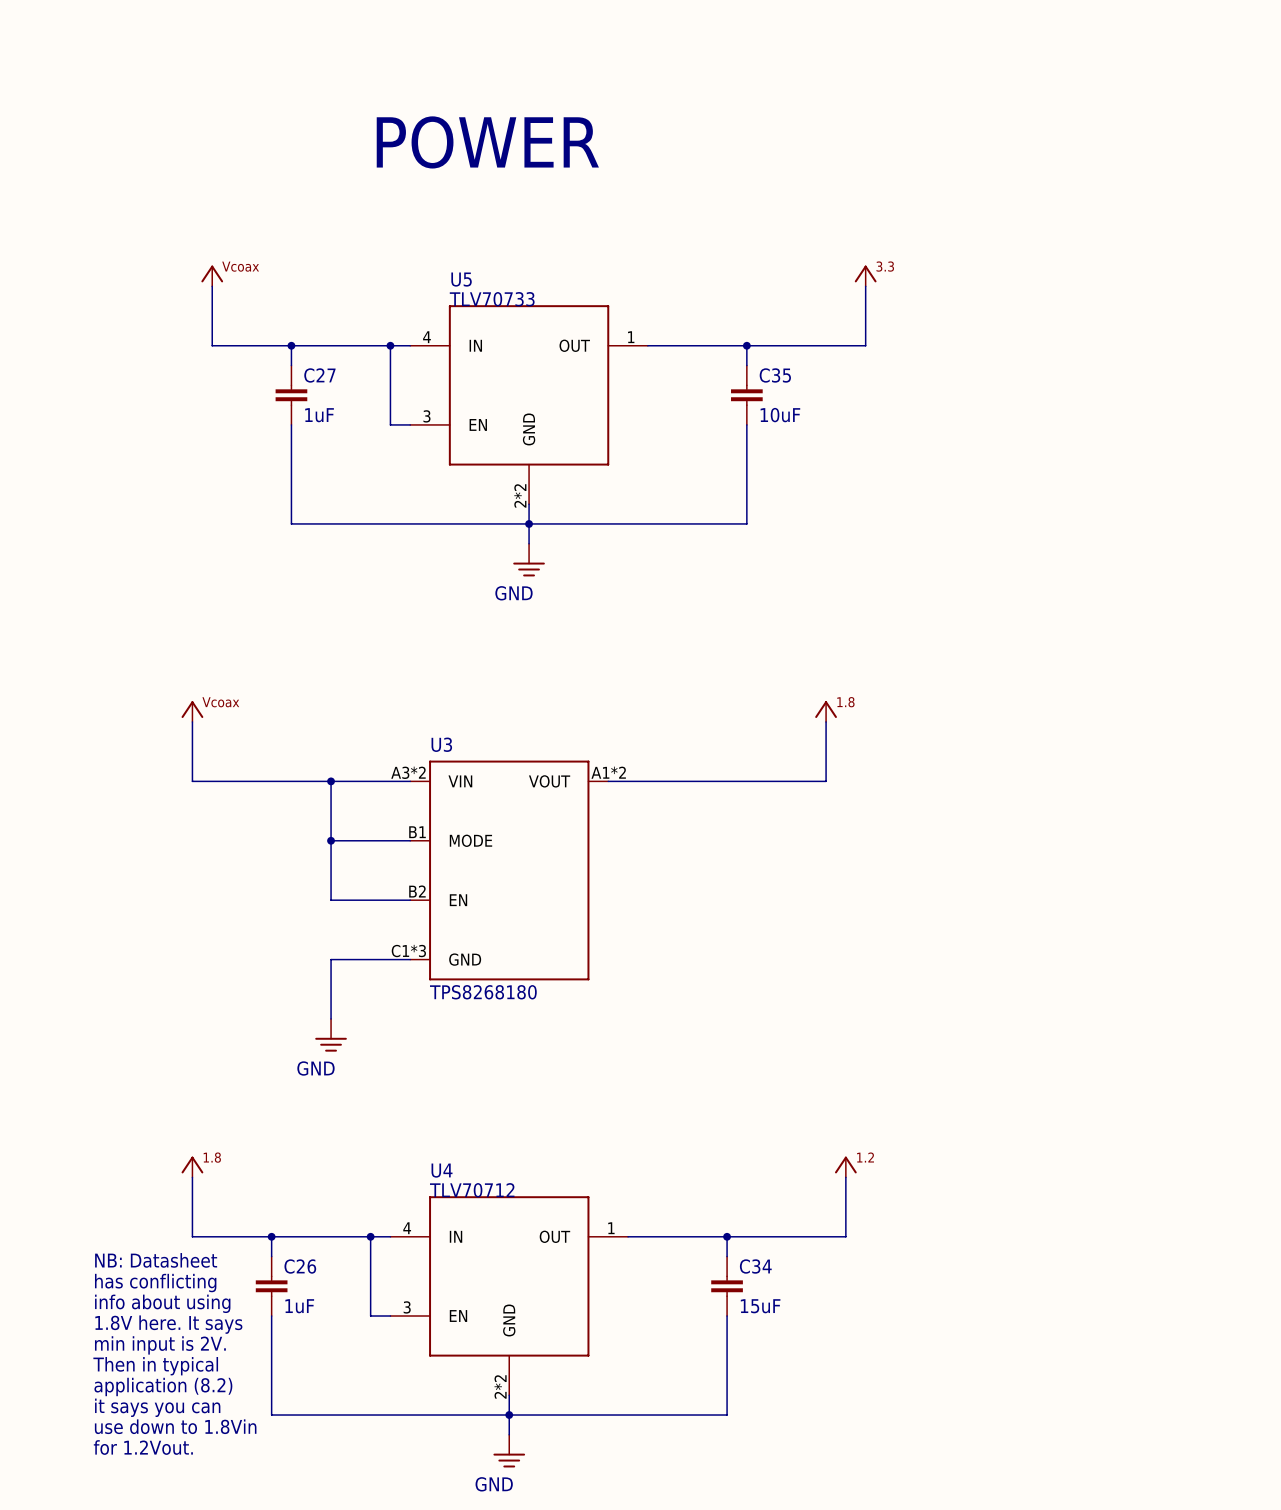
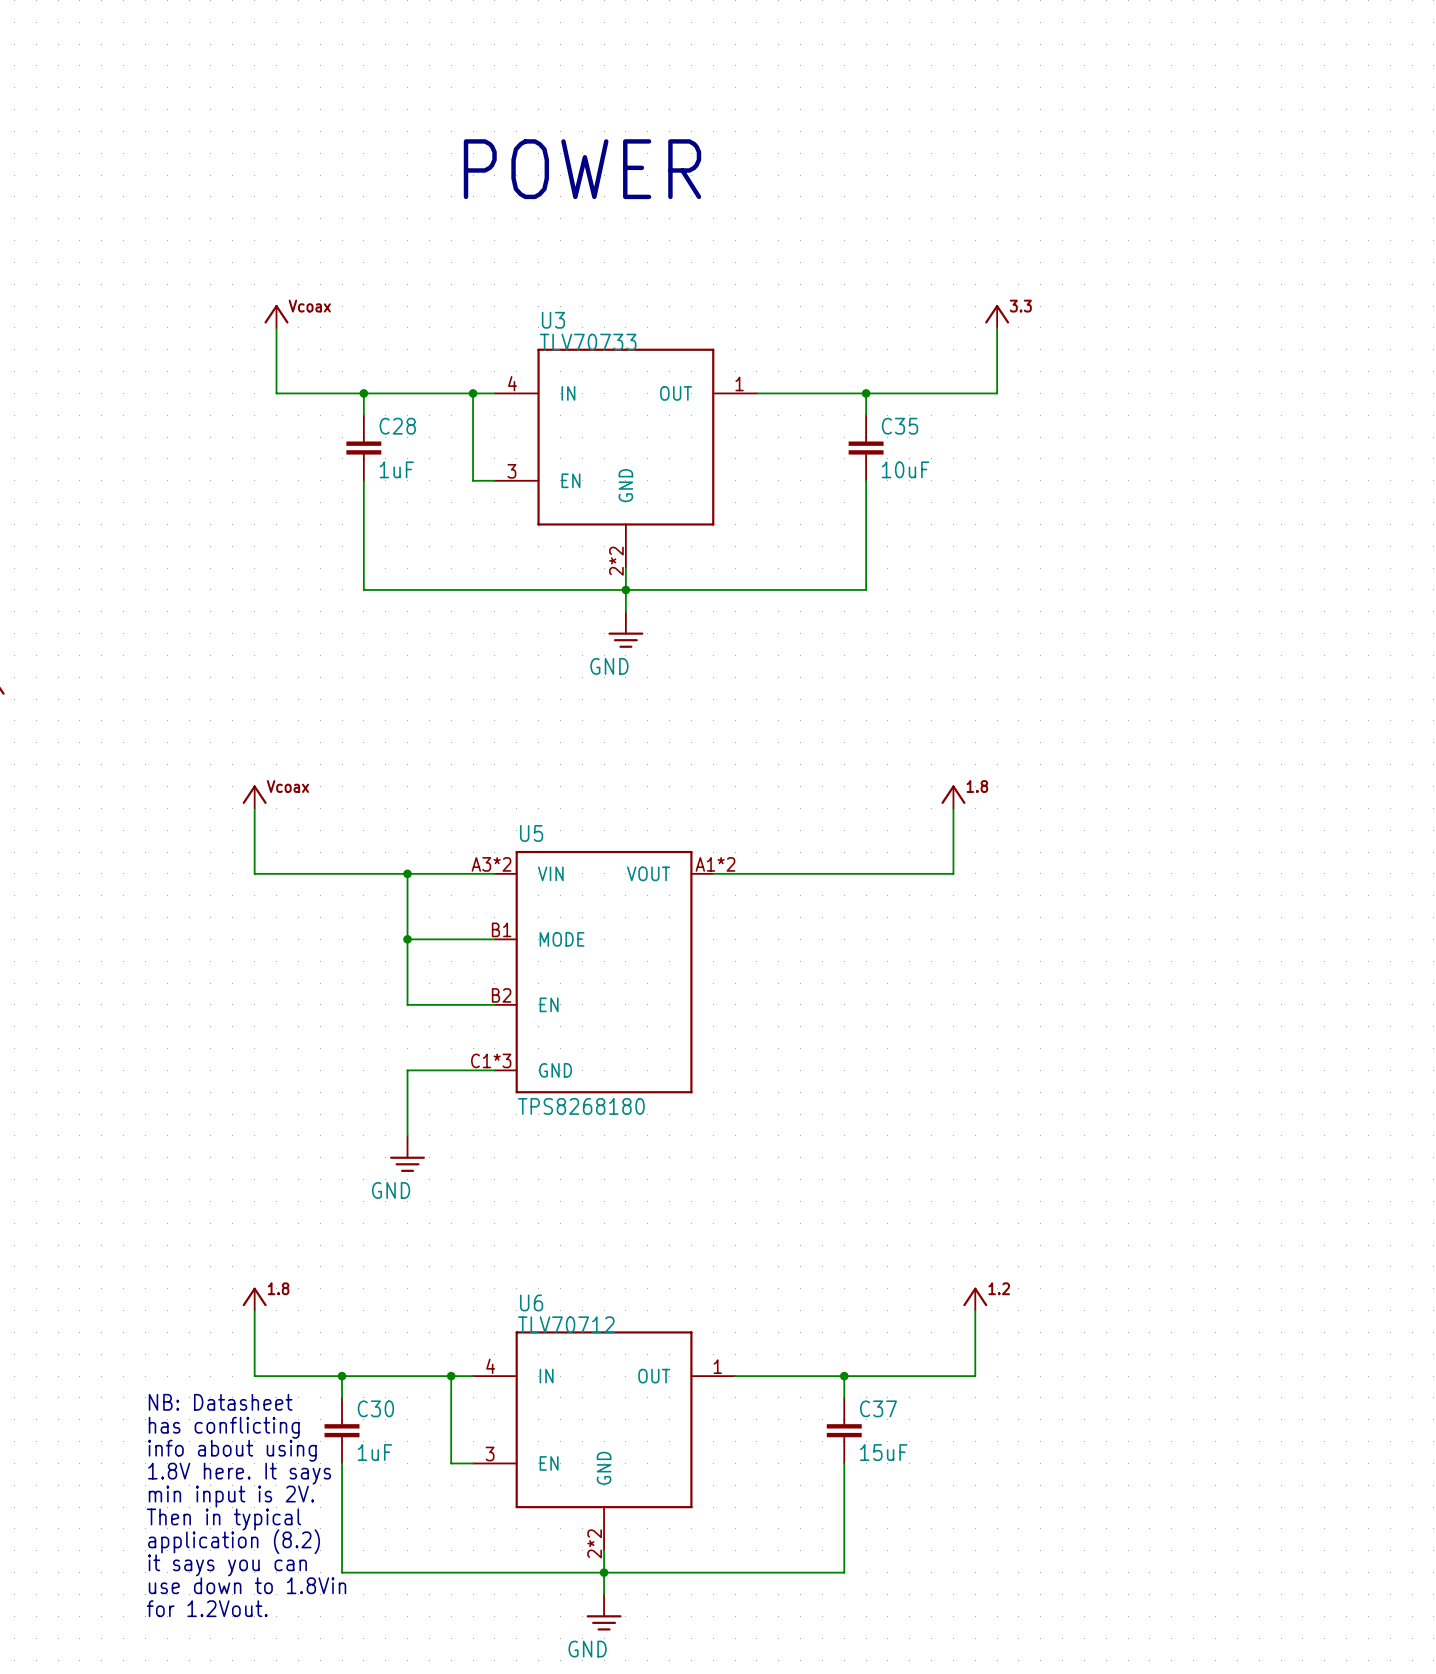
U5 name: U5 (461, 279) -> U3 (553, 320)
C27 name: C27 (319, 375) -> C28 (397, 426)
U3 name: U3 (441, 744) -> U5 (531, 833)
U4 name: U4 (442, 1170) -> U6 (531, 1302)
C26 name: C26 (300, 1266) -> C30 (375, 1408)
C34 name: C34 (755, 1266) -> C37 (878, 1408)

